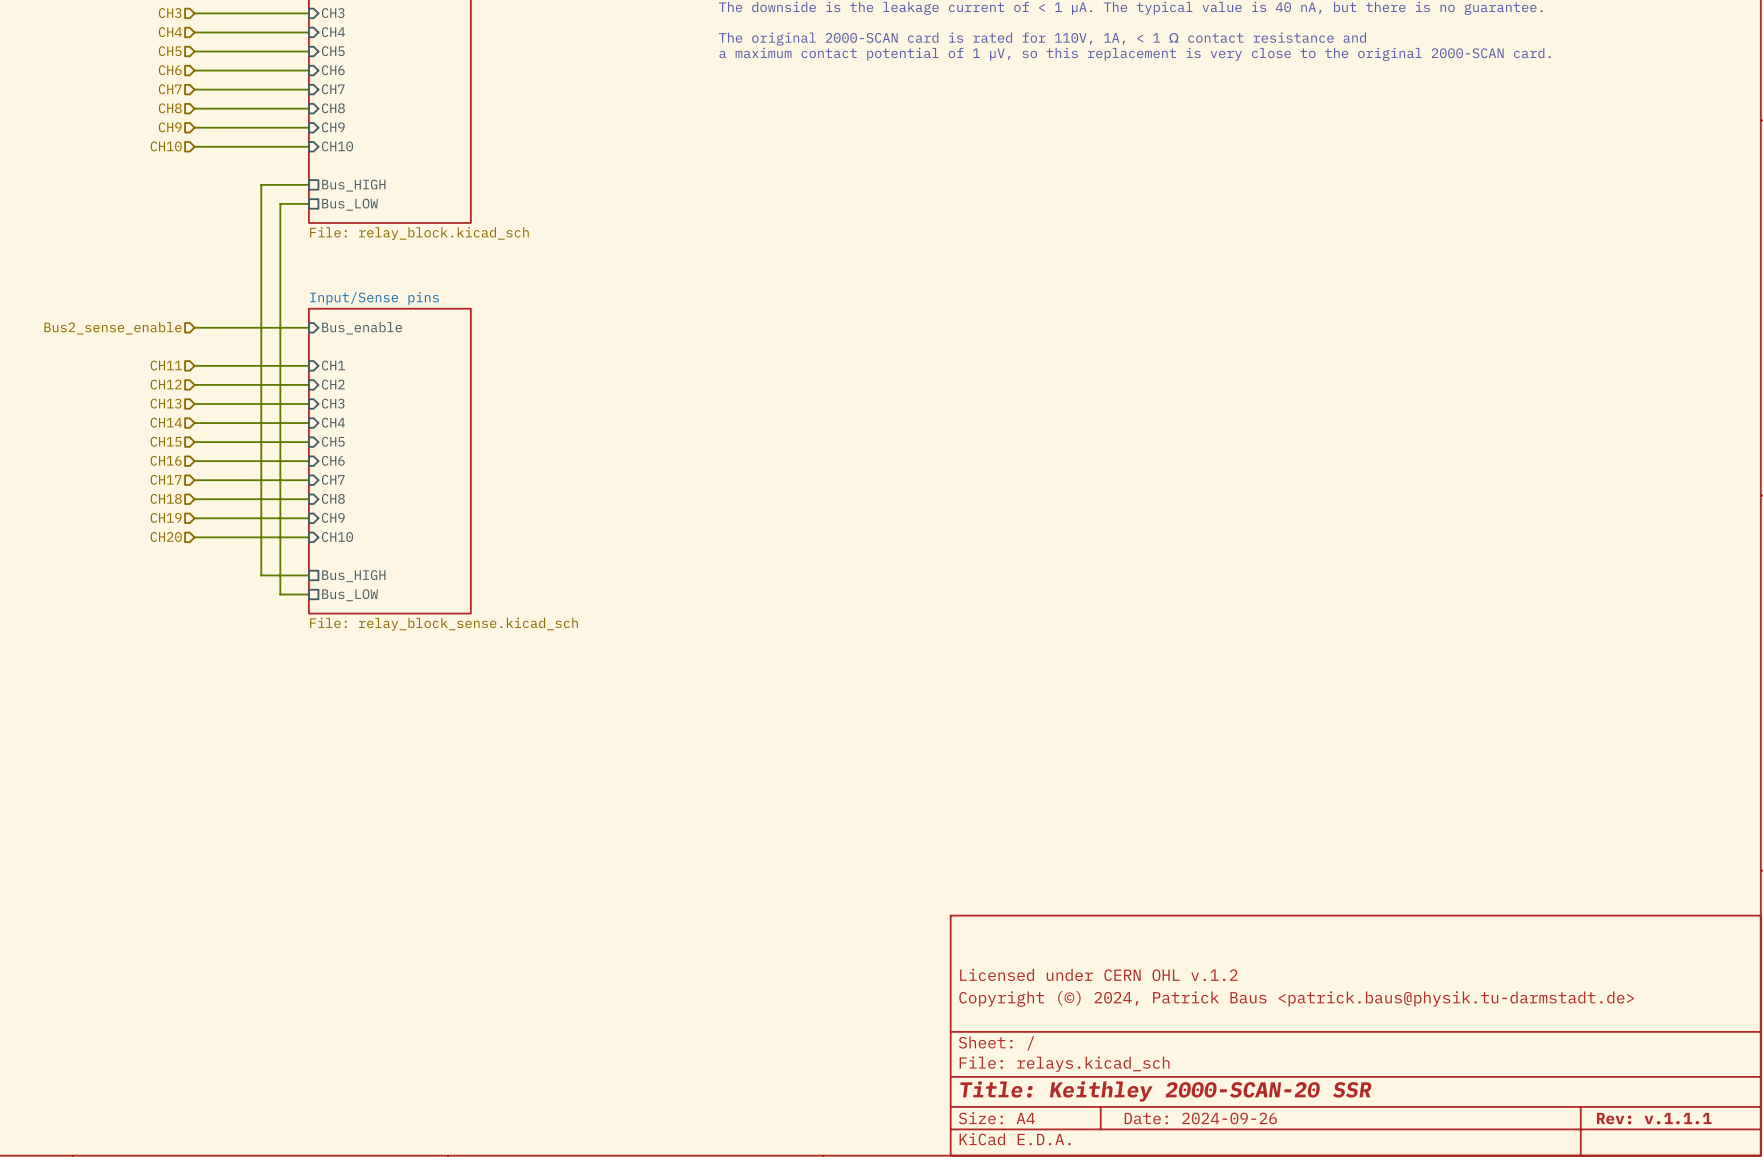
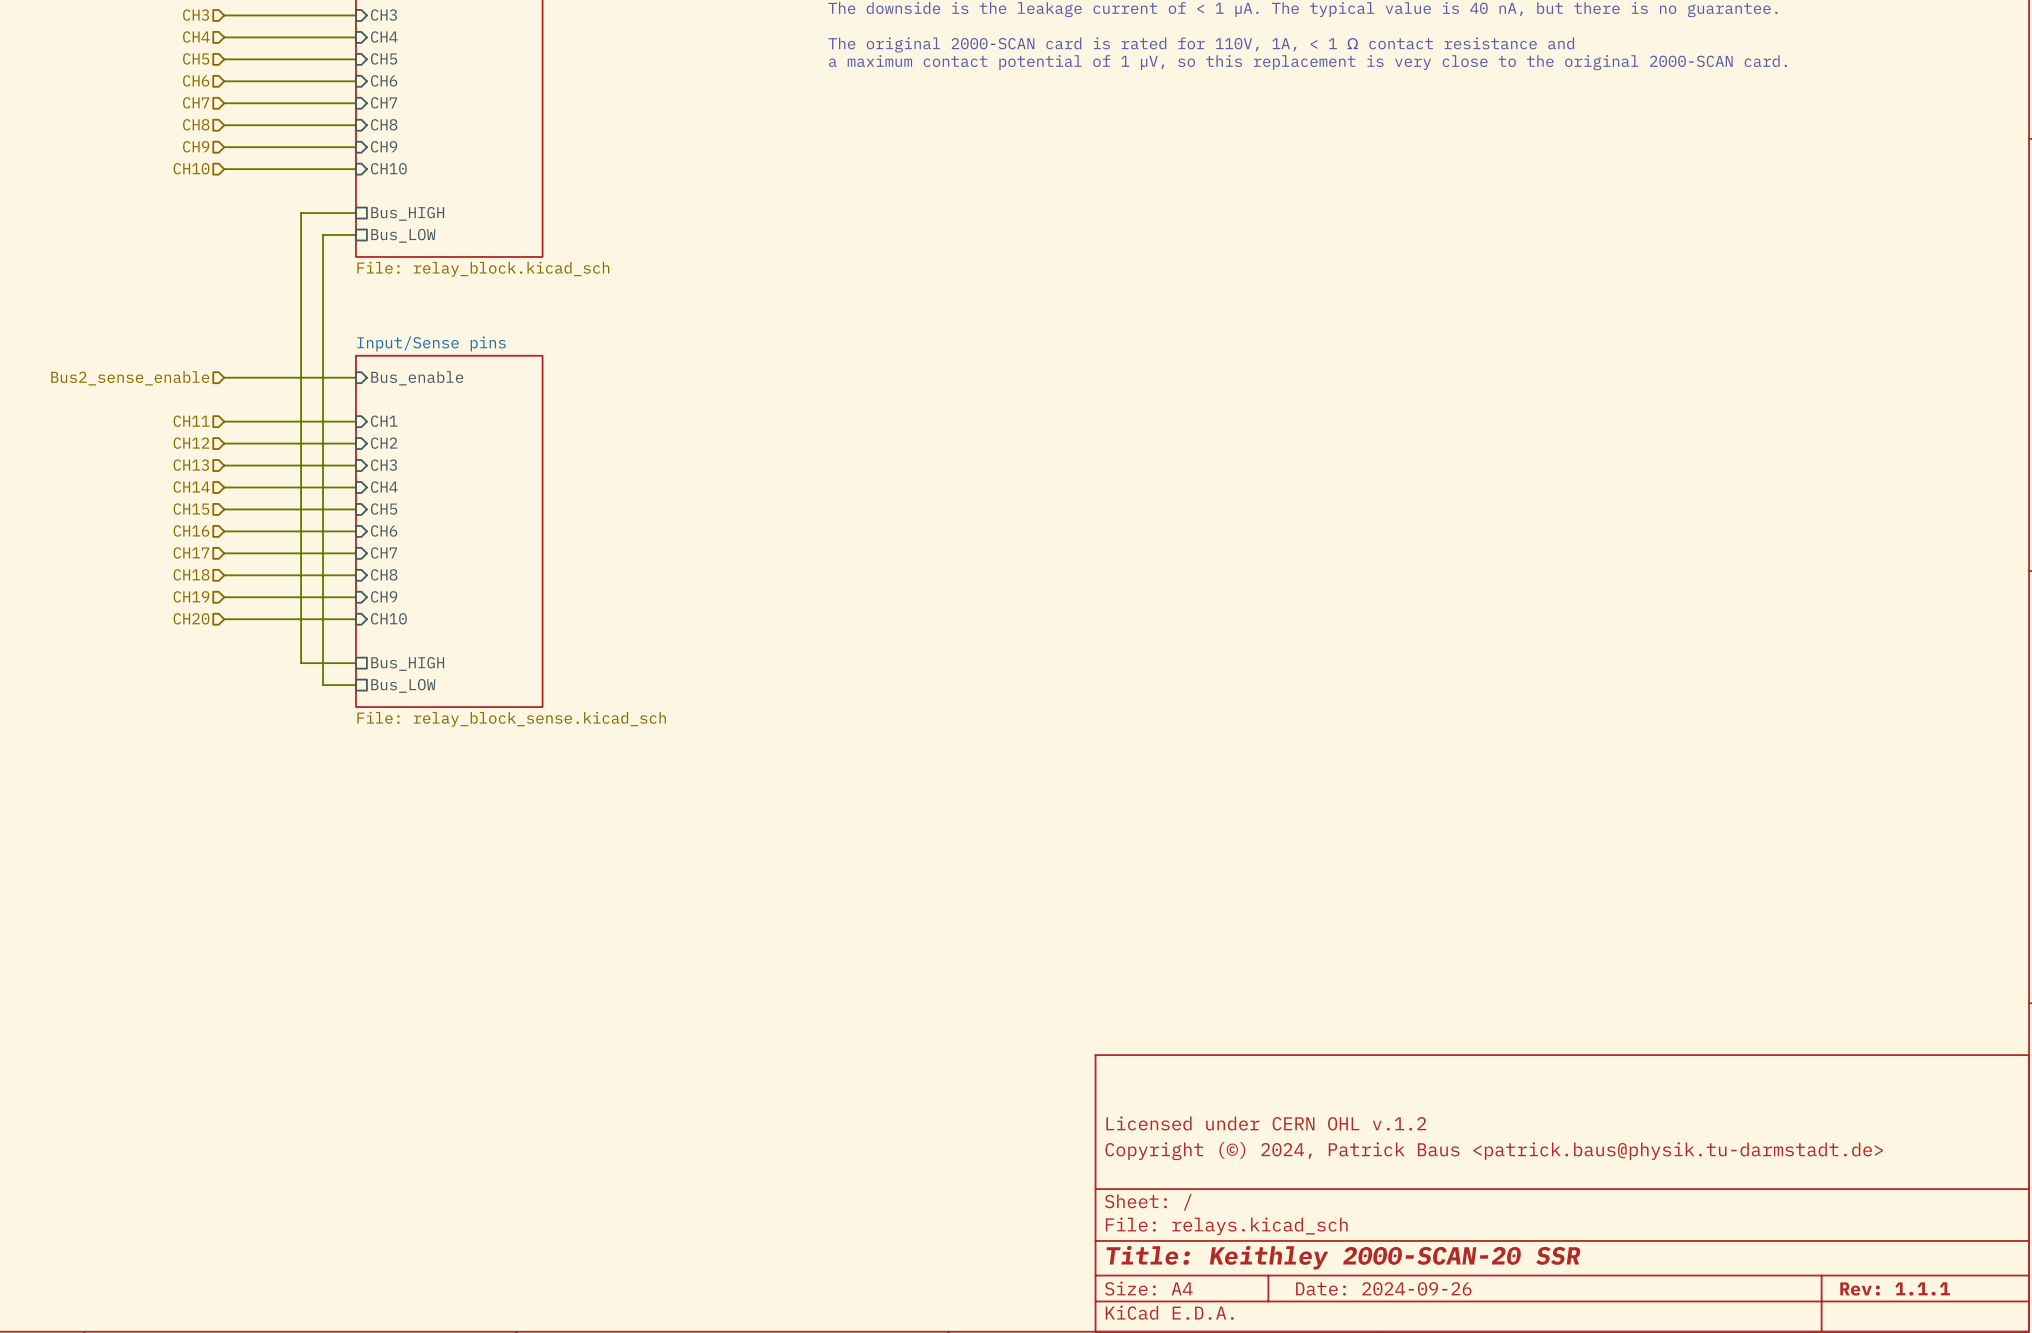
title block: Rev: v.1.1.1 (1654, 1118) -> Rev: 1.1.1 (1895, 1289)

